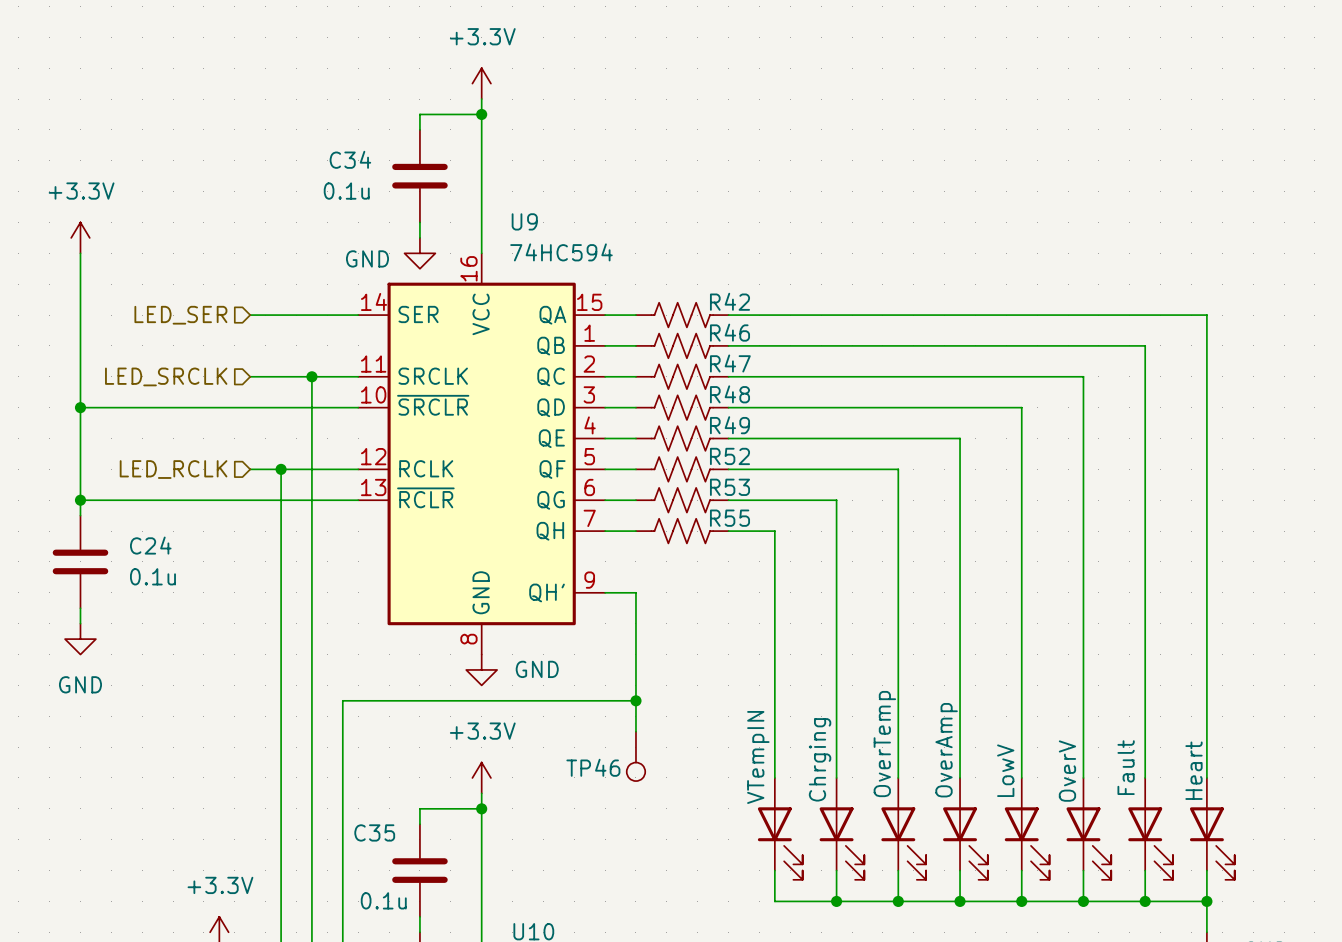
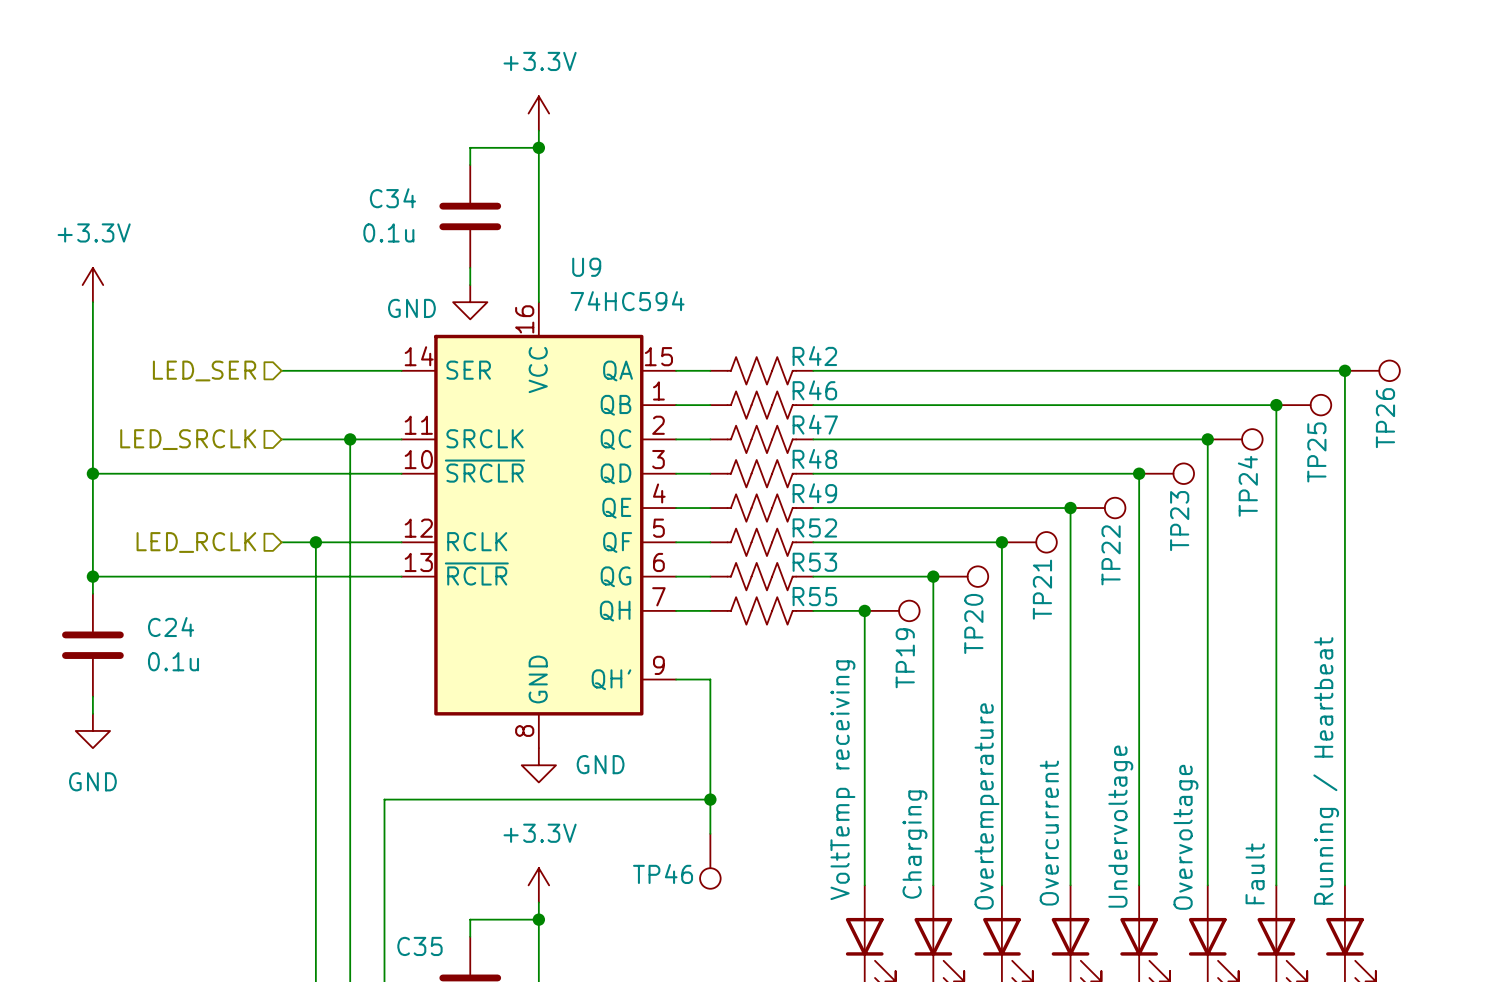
junction: none -> (1344, 370)
TP26: none -> (1372, 370)
junction: none -> (1276, 405)
TP25: none -> (1303, 405)
junction: none -> (1207, 439)
TP24: none -> (1235, 439)
junction: none -> (1139, 473)
TP23: none -> (1166, 473)
junction: none -> (1070, 508)
TP22: none -> (1097, 508)
junction: none -> (1001, 542)
TP21: none -> (1029, 542)
junction: none -> (933, 576)
TP20: none -> (960, 576)
junction: none -> (864, 610)
TP19: none -> (892, 610)
part value: OverTemp (884, 744) -> Overtemperature (987, 806)
part value: OverAmp (946, 750) -> Overcurrent (1049, 833)
part value: VTempIN (758, 757) -> VoltTemp receiving (842, 780)
part value: Chrging (820, 759) -> Charging (914, 844)
part value: LowV (1005, 770) -> Undervoltage (1120, 826)
part value: Heart (1193, 770) -> Running / Heartbeat (1326, 770)
part value: OverV (1067, 771) -> Overvoltage (1185, 837)

